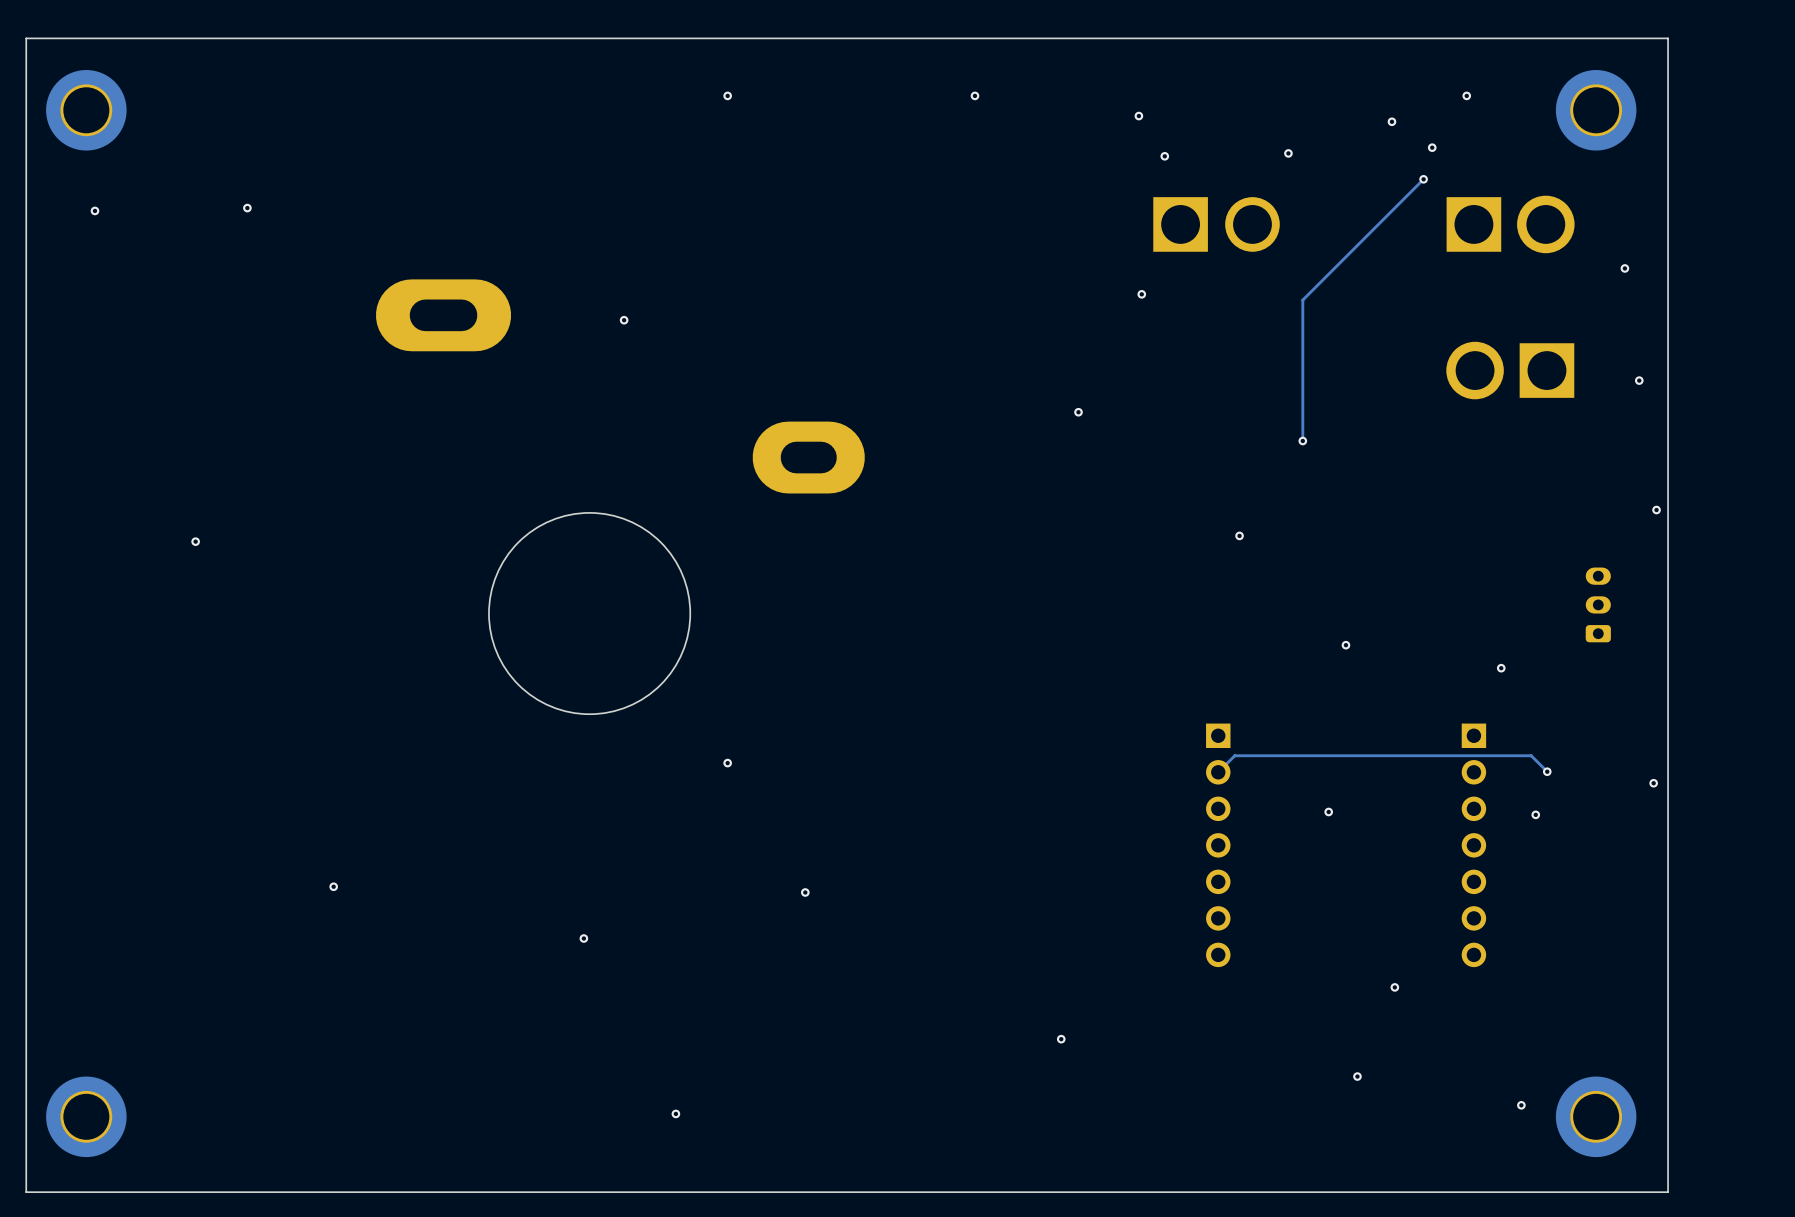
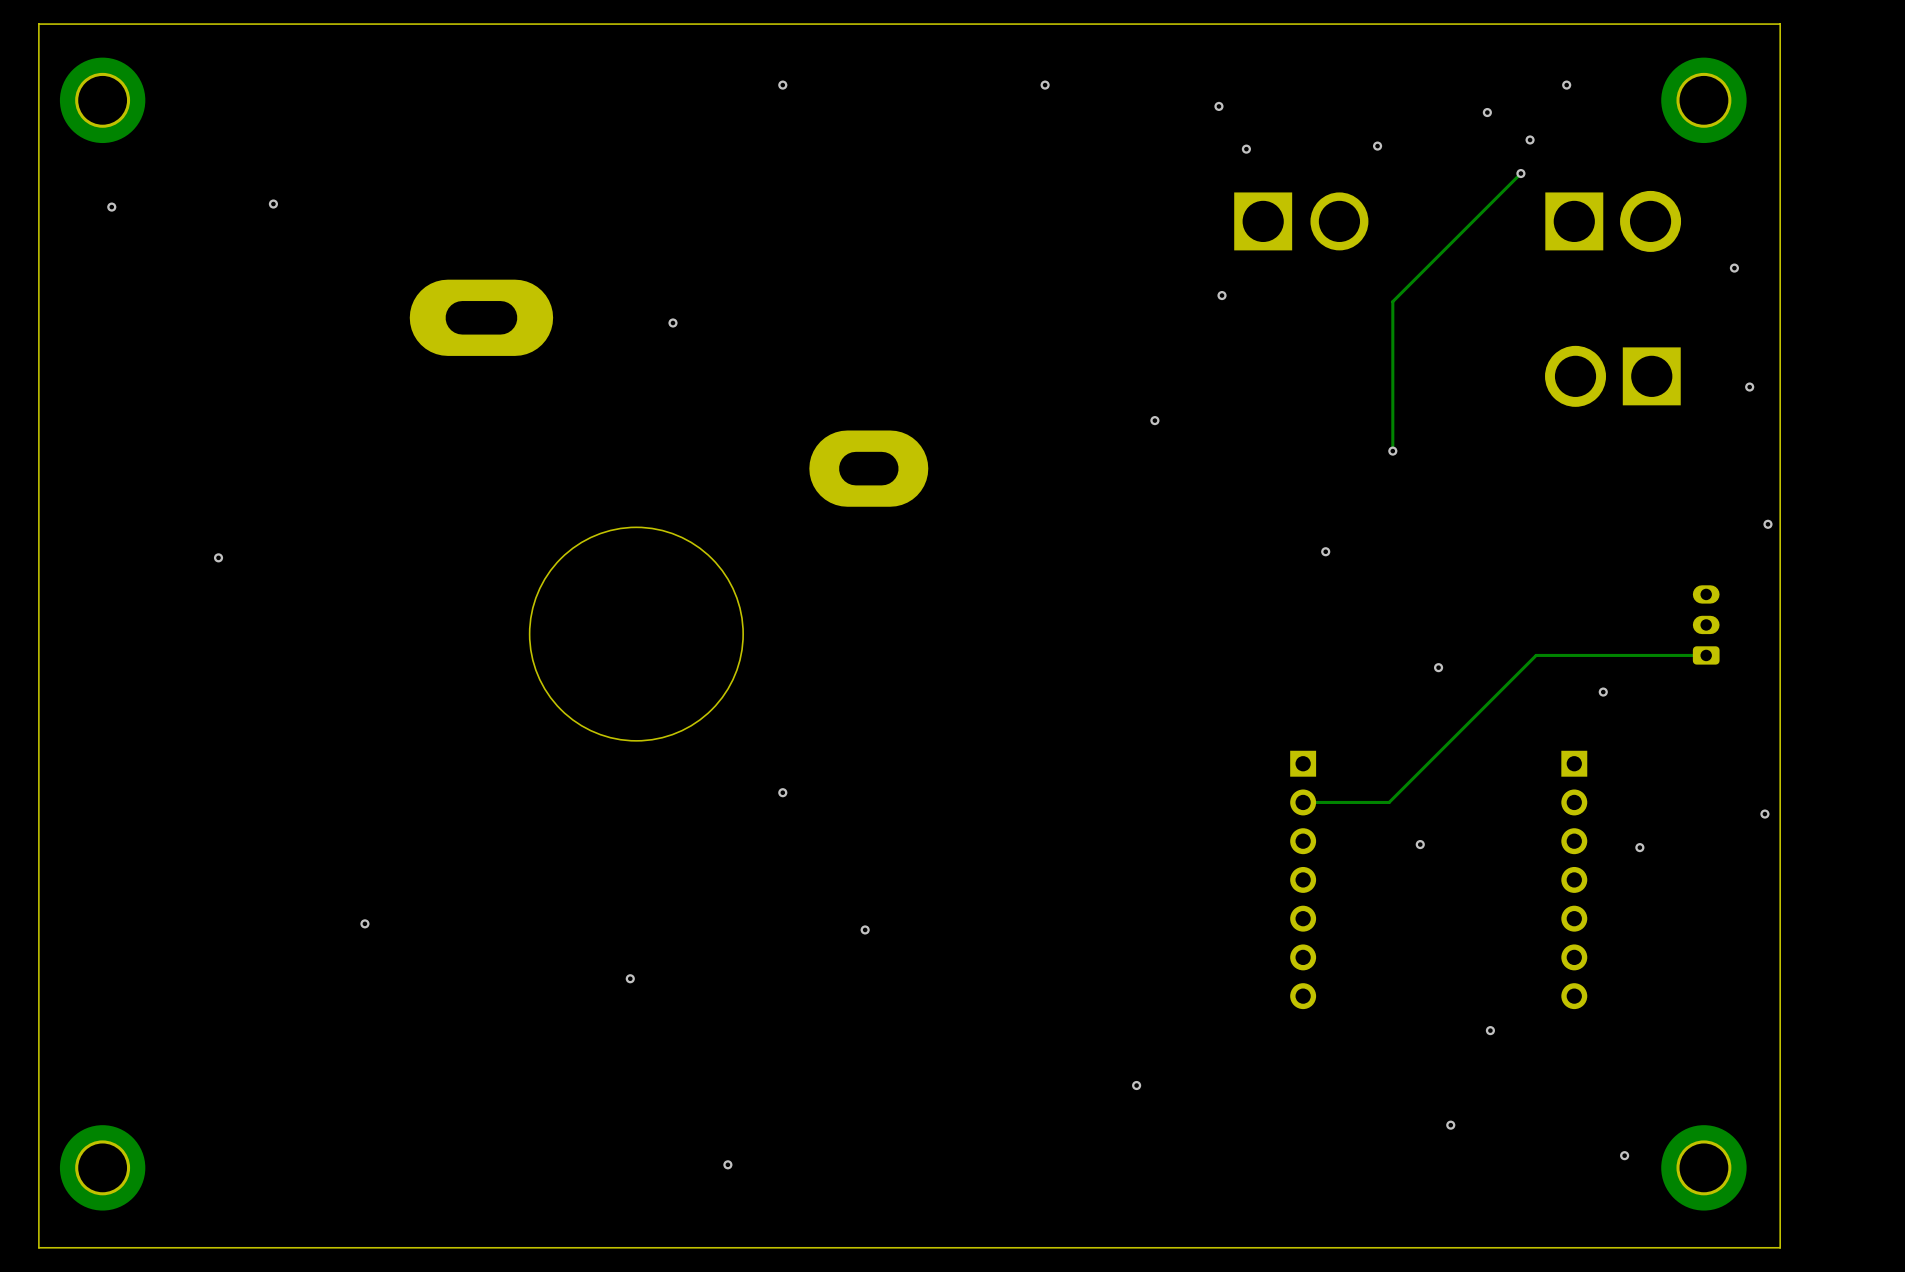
track: (1547, 771) (1531, 755) (1234, 755) (1218, 772) -> (1706, 655) (1536, 655) (1389, 802) (1303, 802)
via: (1547, 771) -> none

